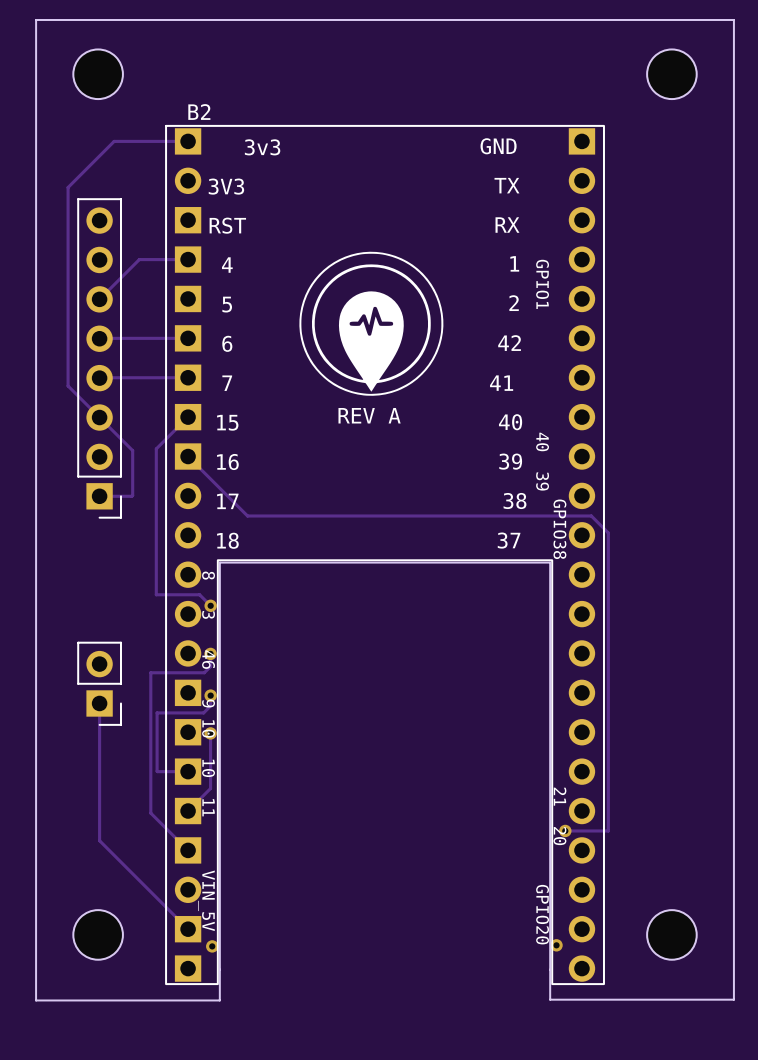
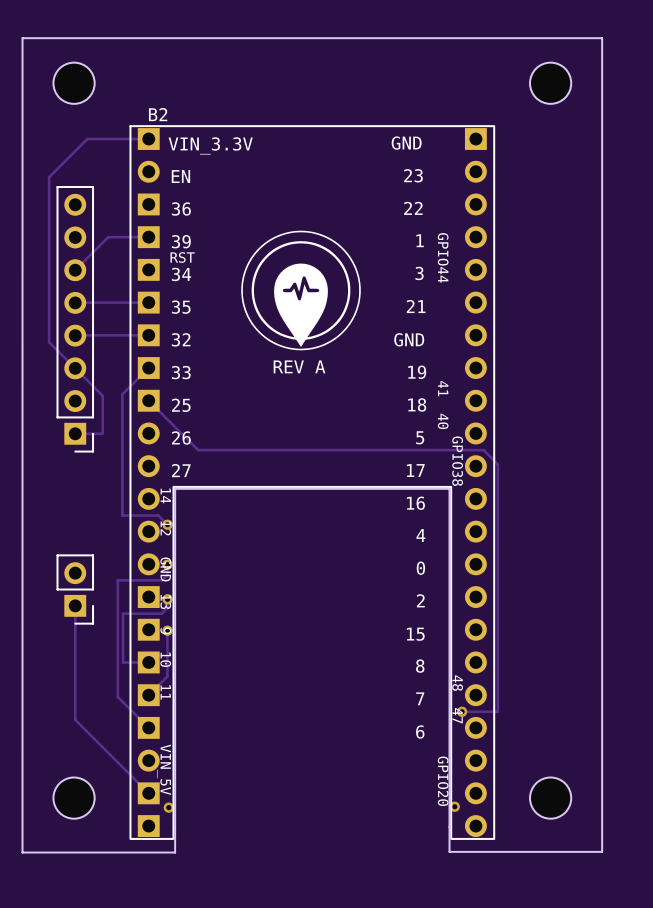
B2 footprint: [165, 125, 605, 985] -> [130, 125, 495, 840]

